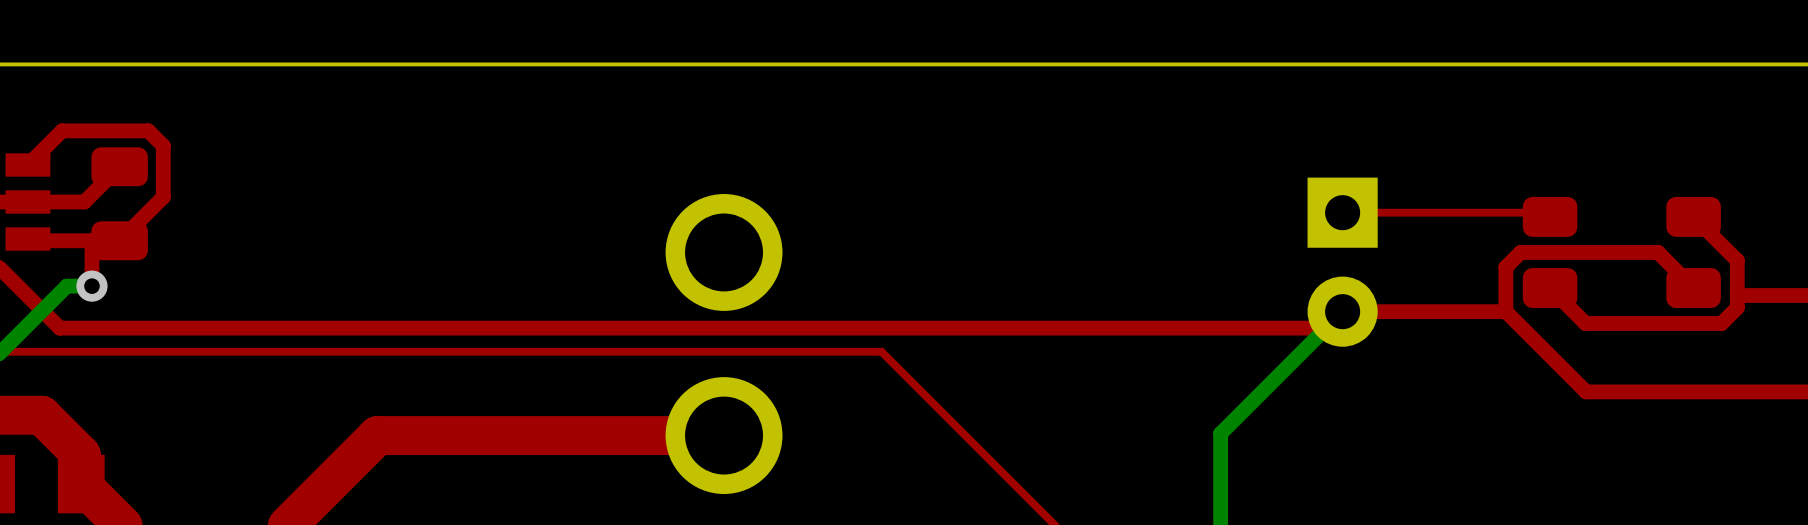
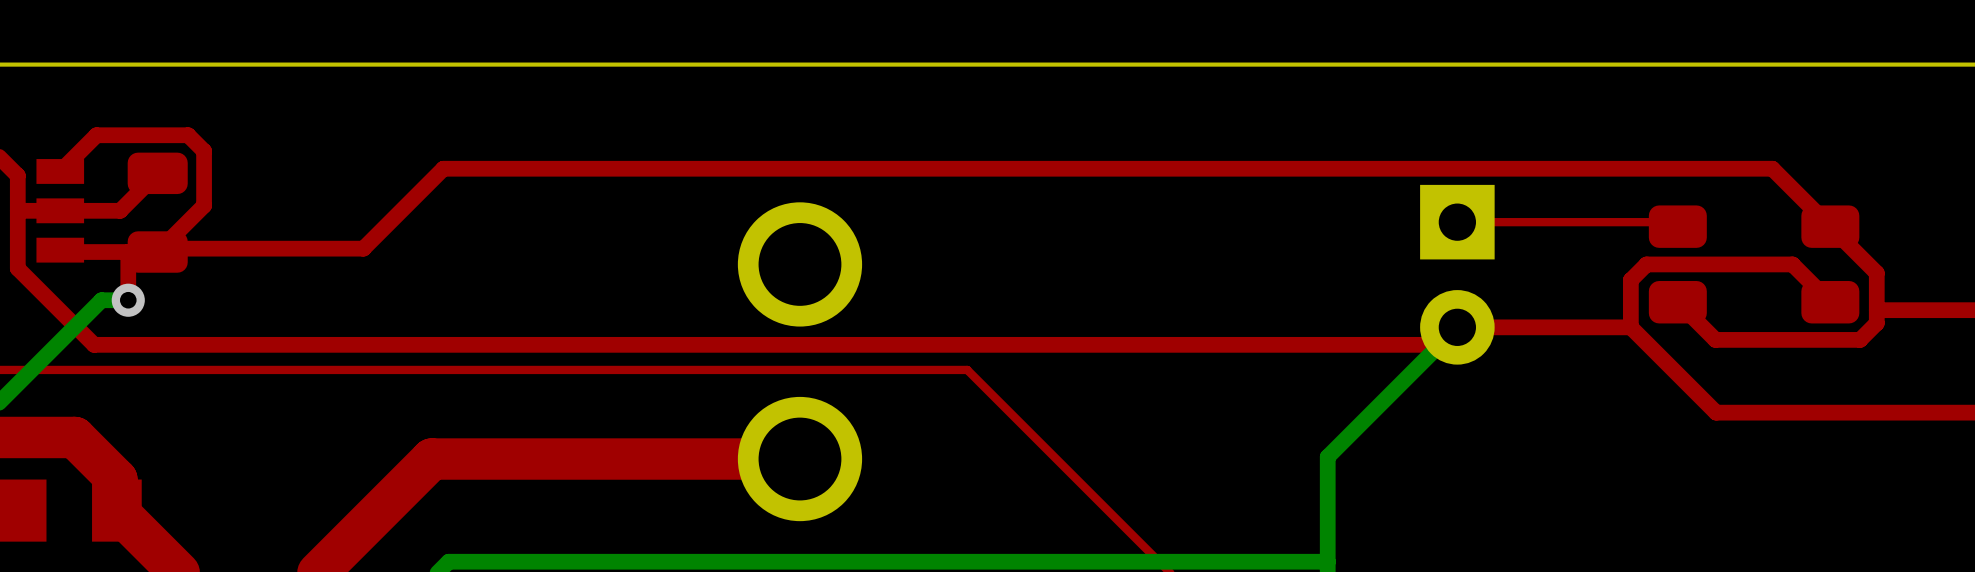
top track: none -> (1830, 226) (1772, 168) (443, 168) (363, 248) (161, 248)

